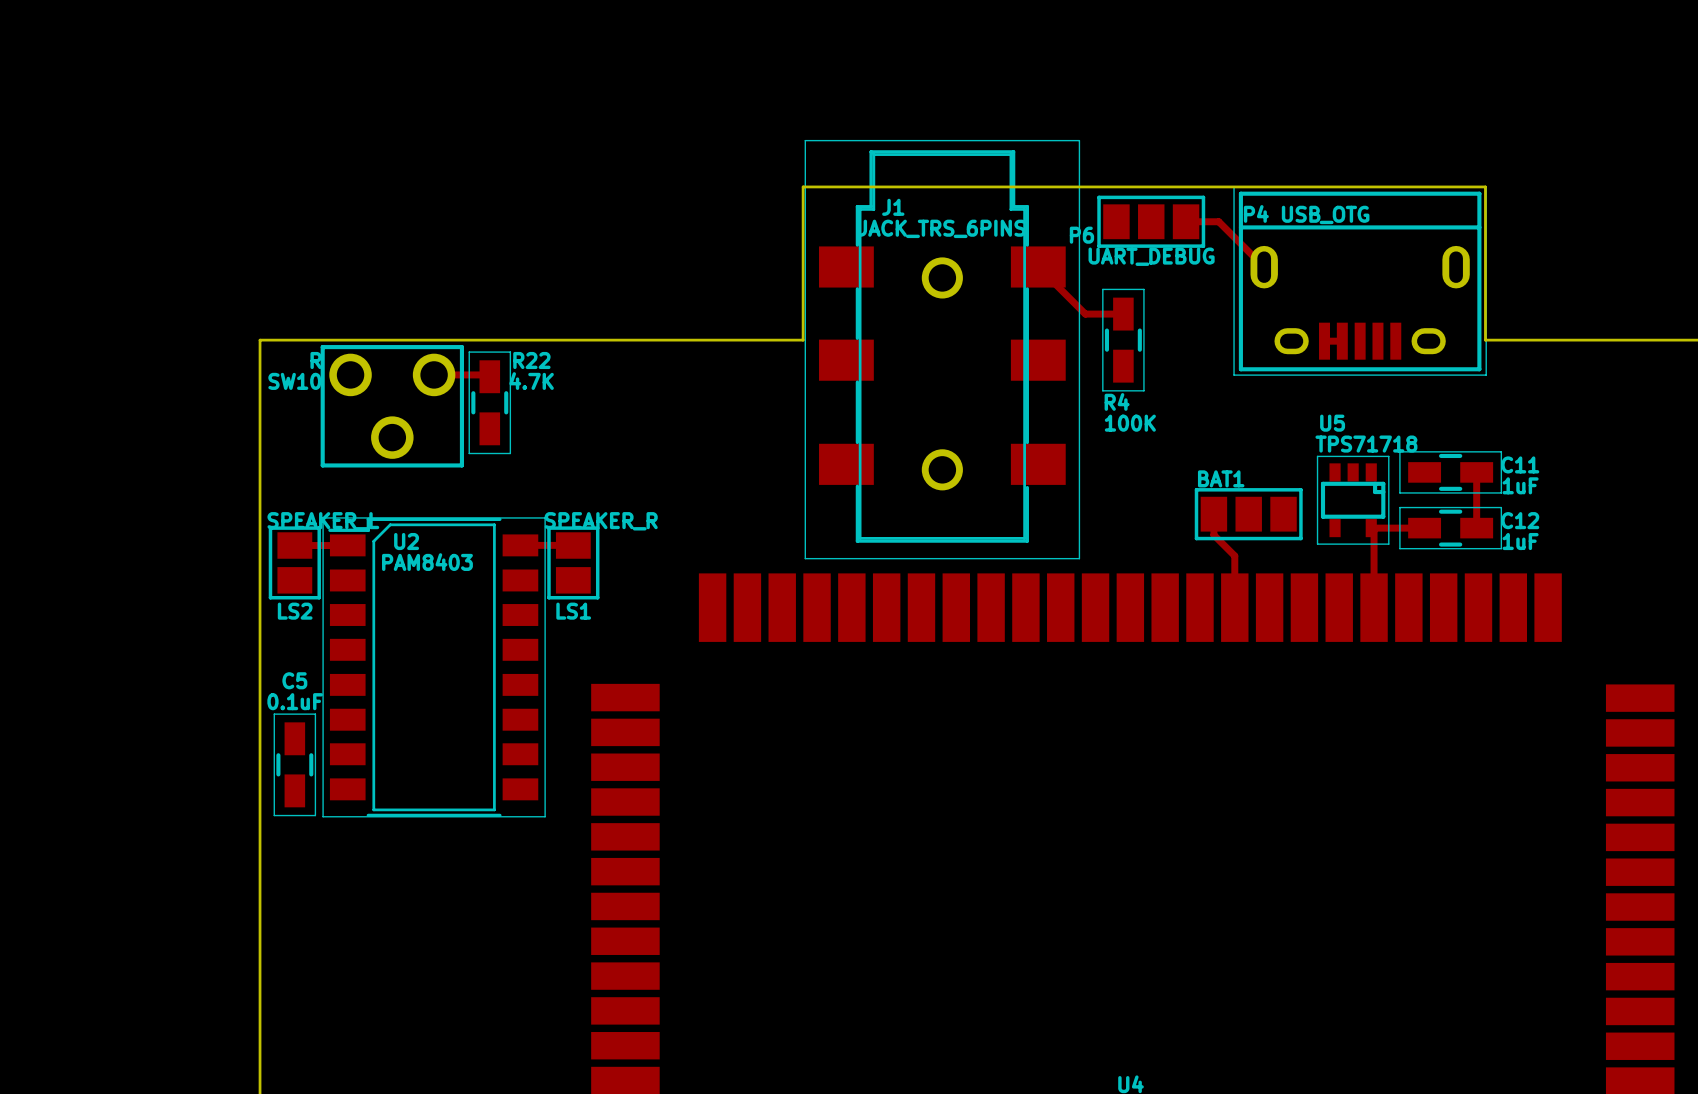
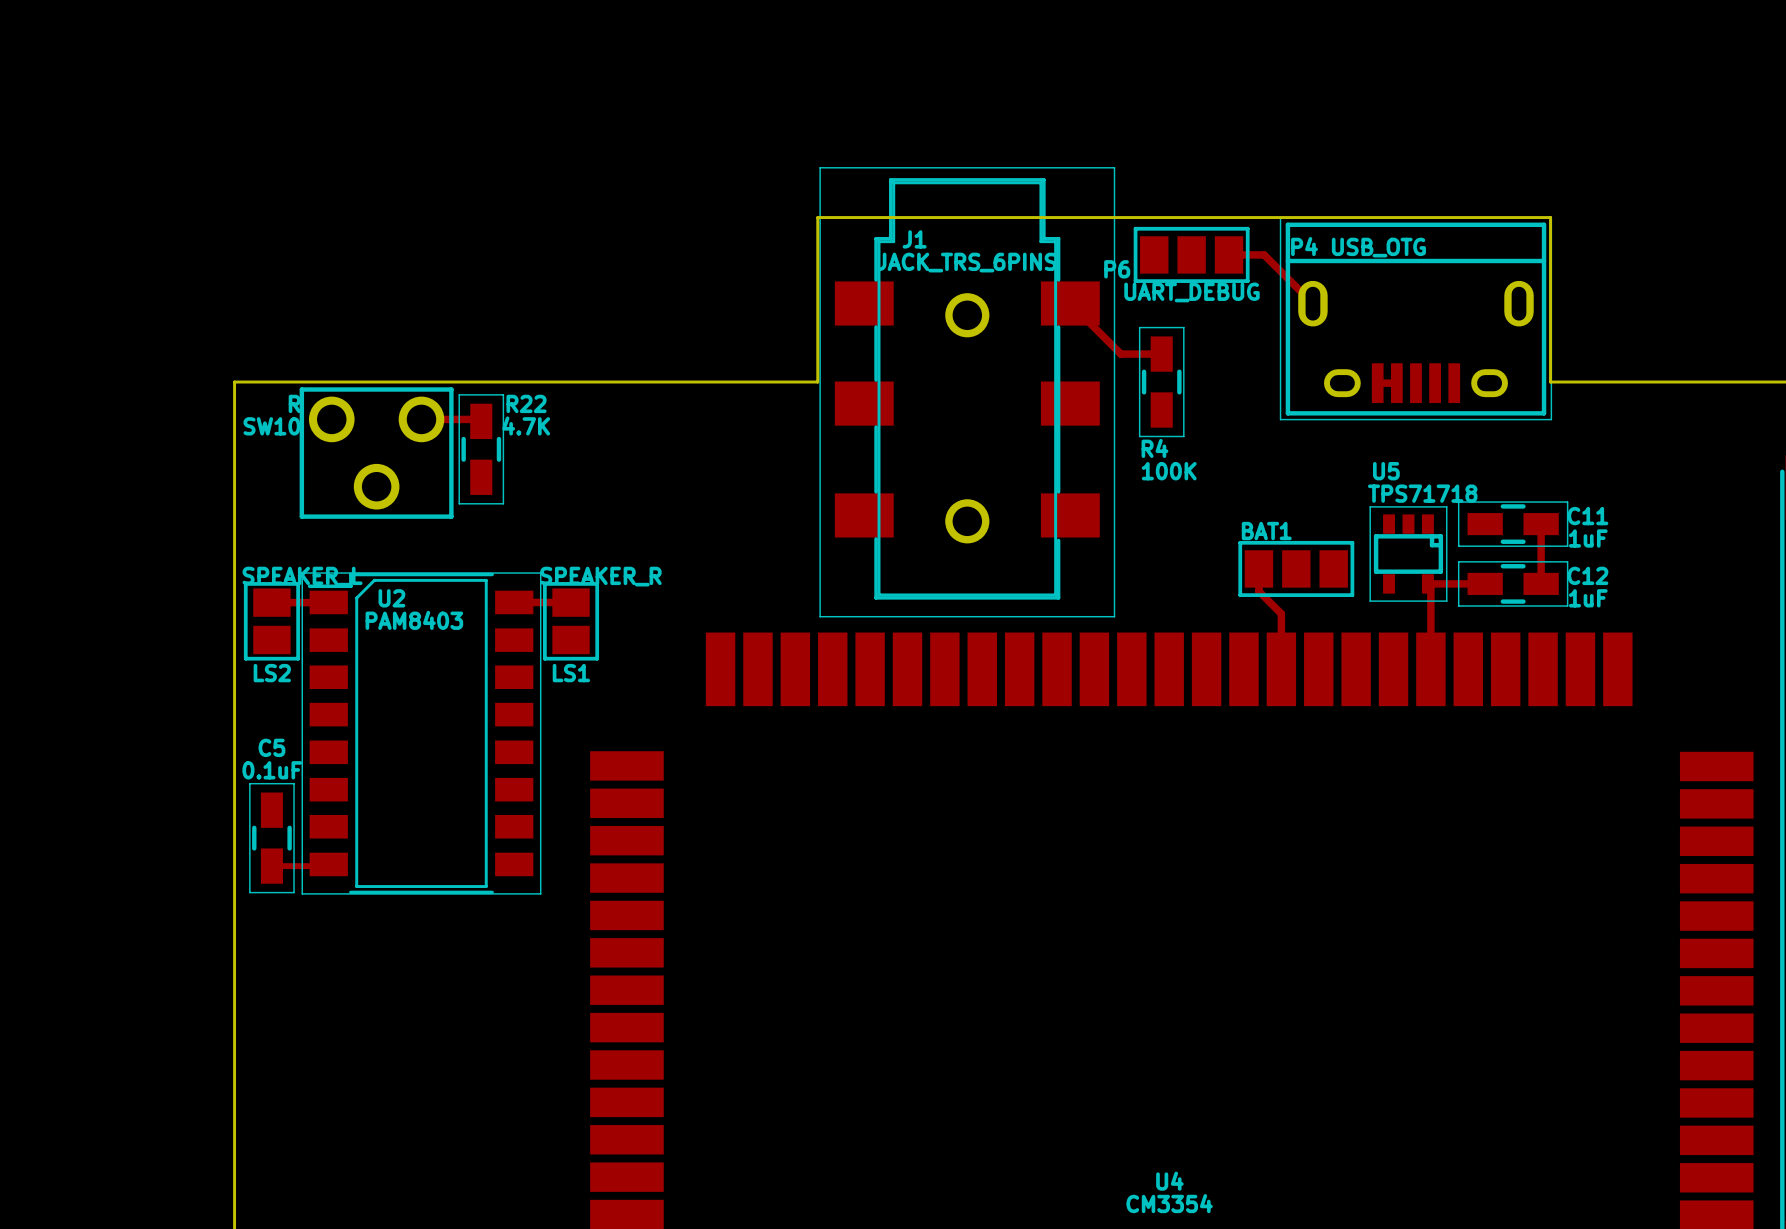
track: none -> (328, 864) (327, 866) (271, 866)

